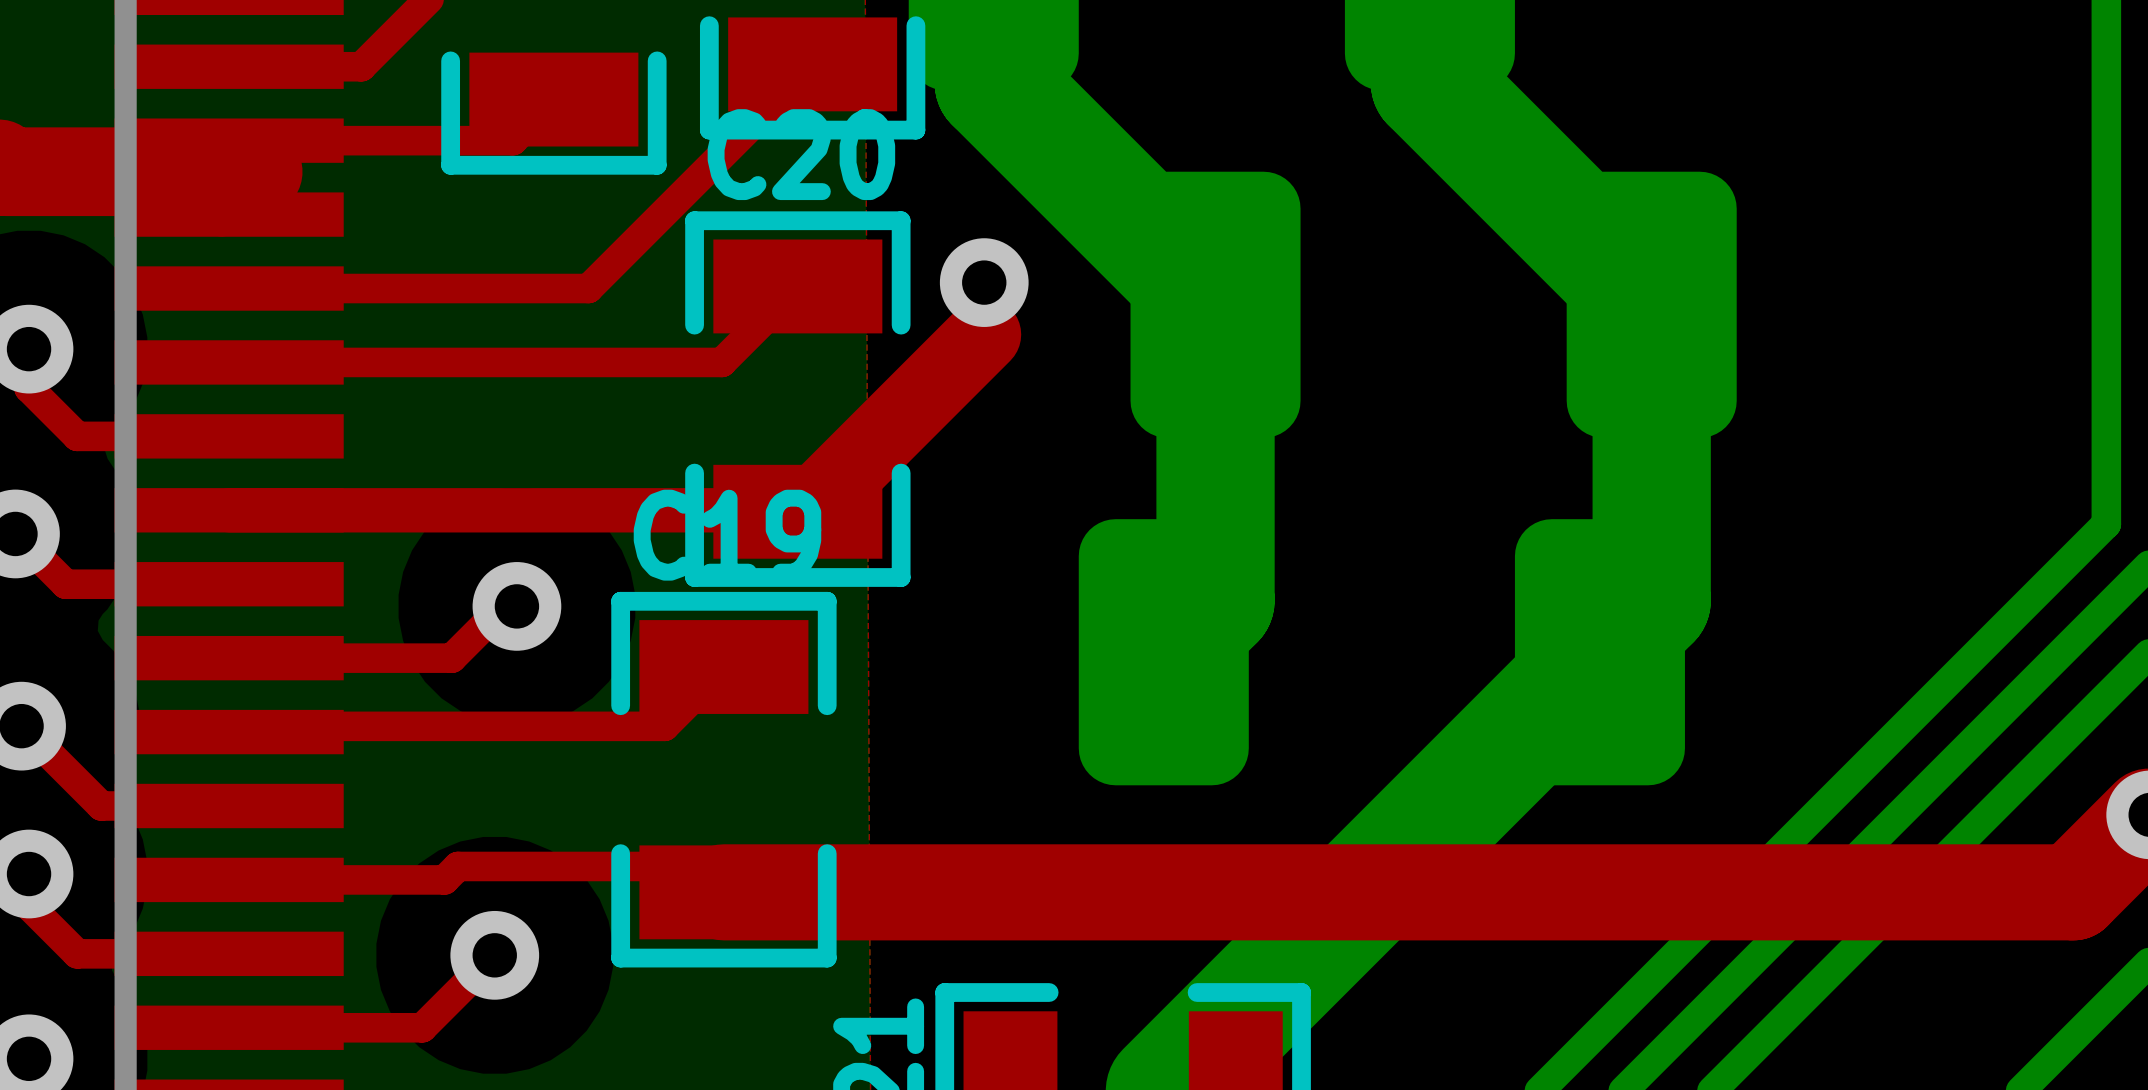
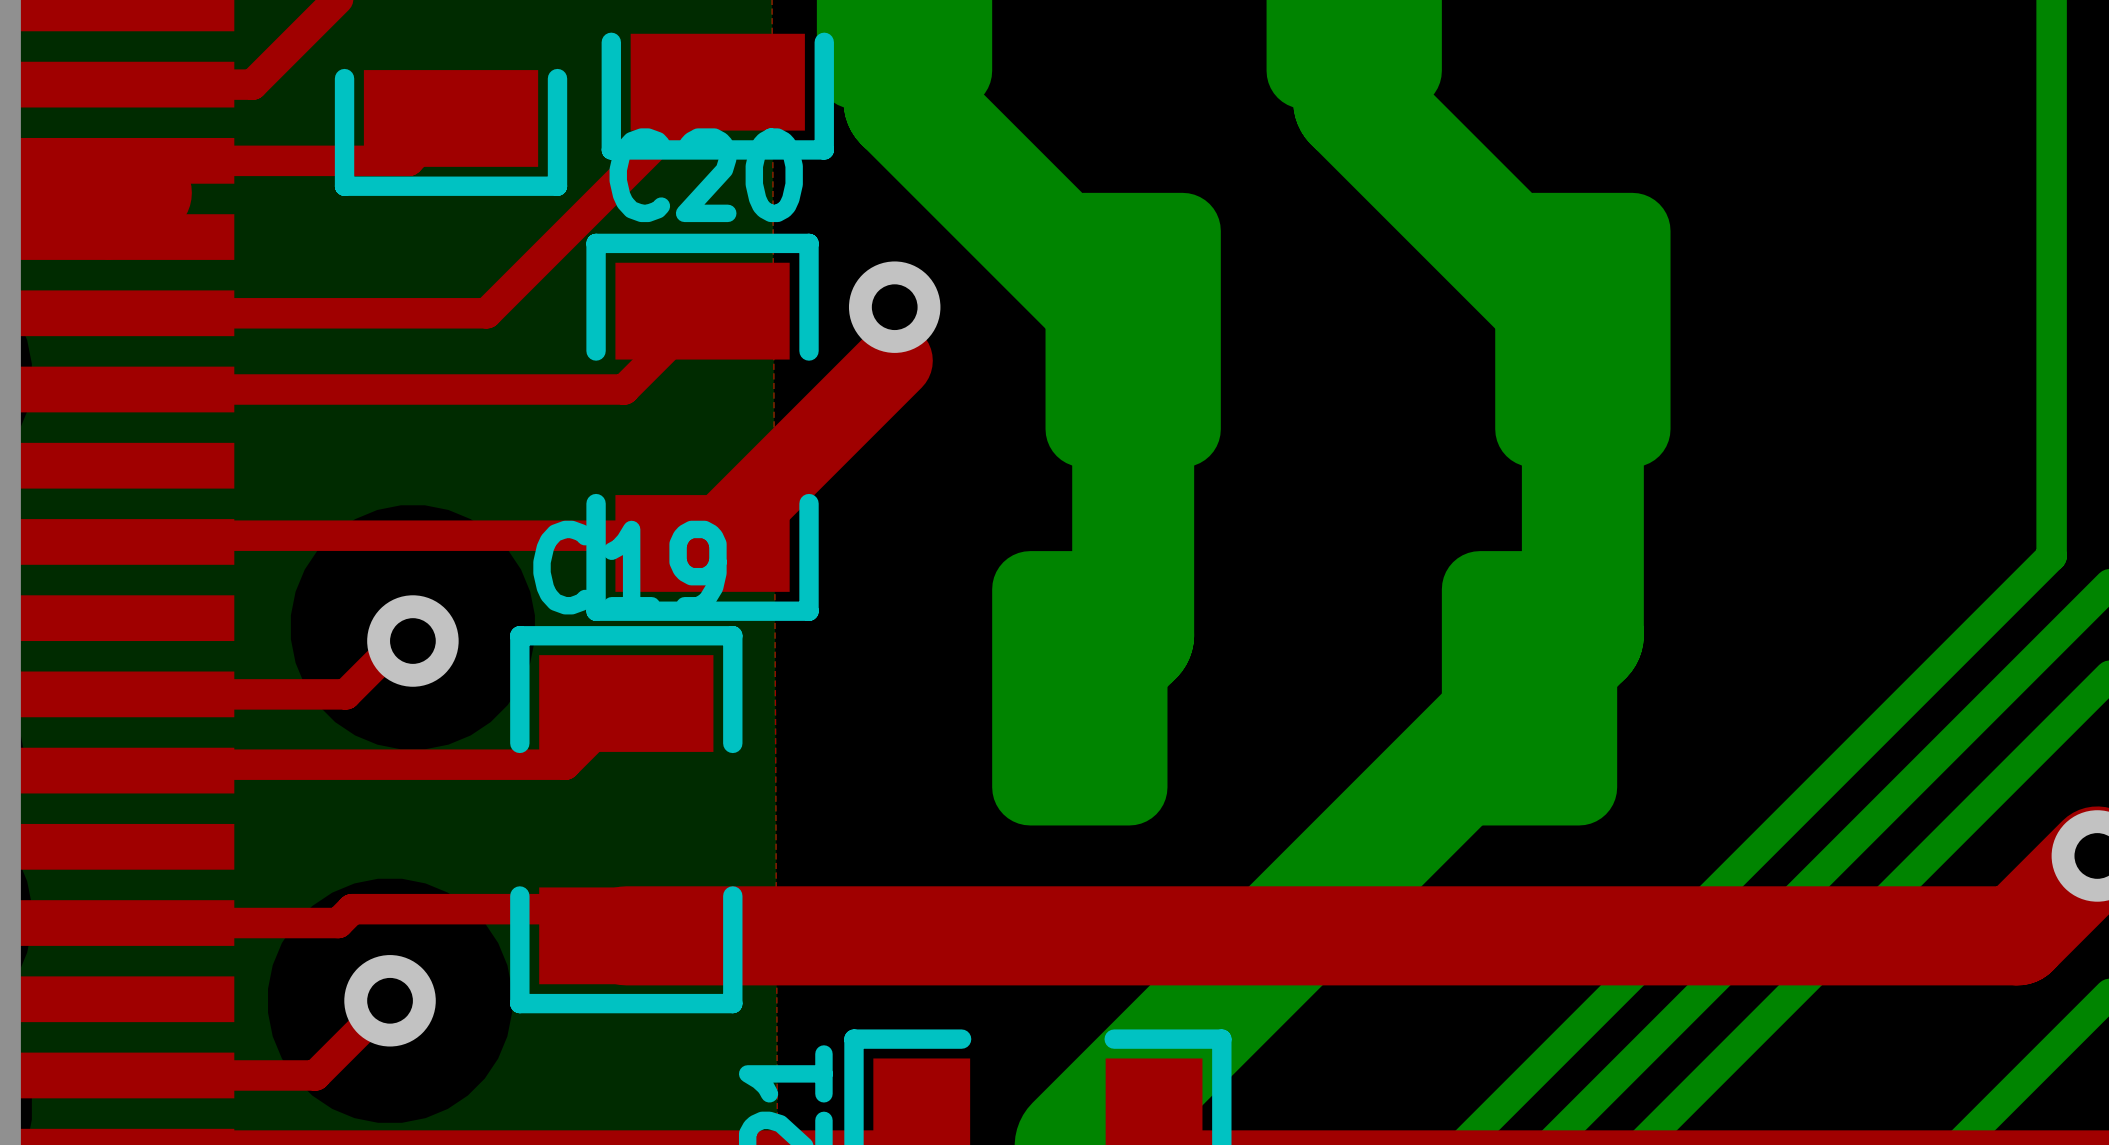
top track: none -> (122, 535) (694, 535)
top track: (229, 510) (796, 510) -> none

